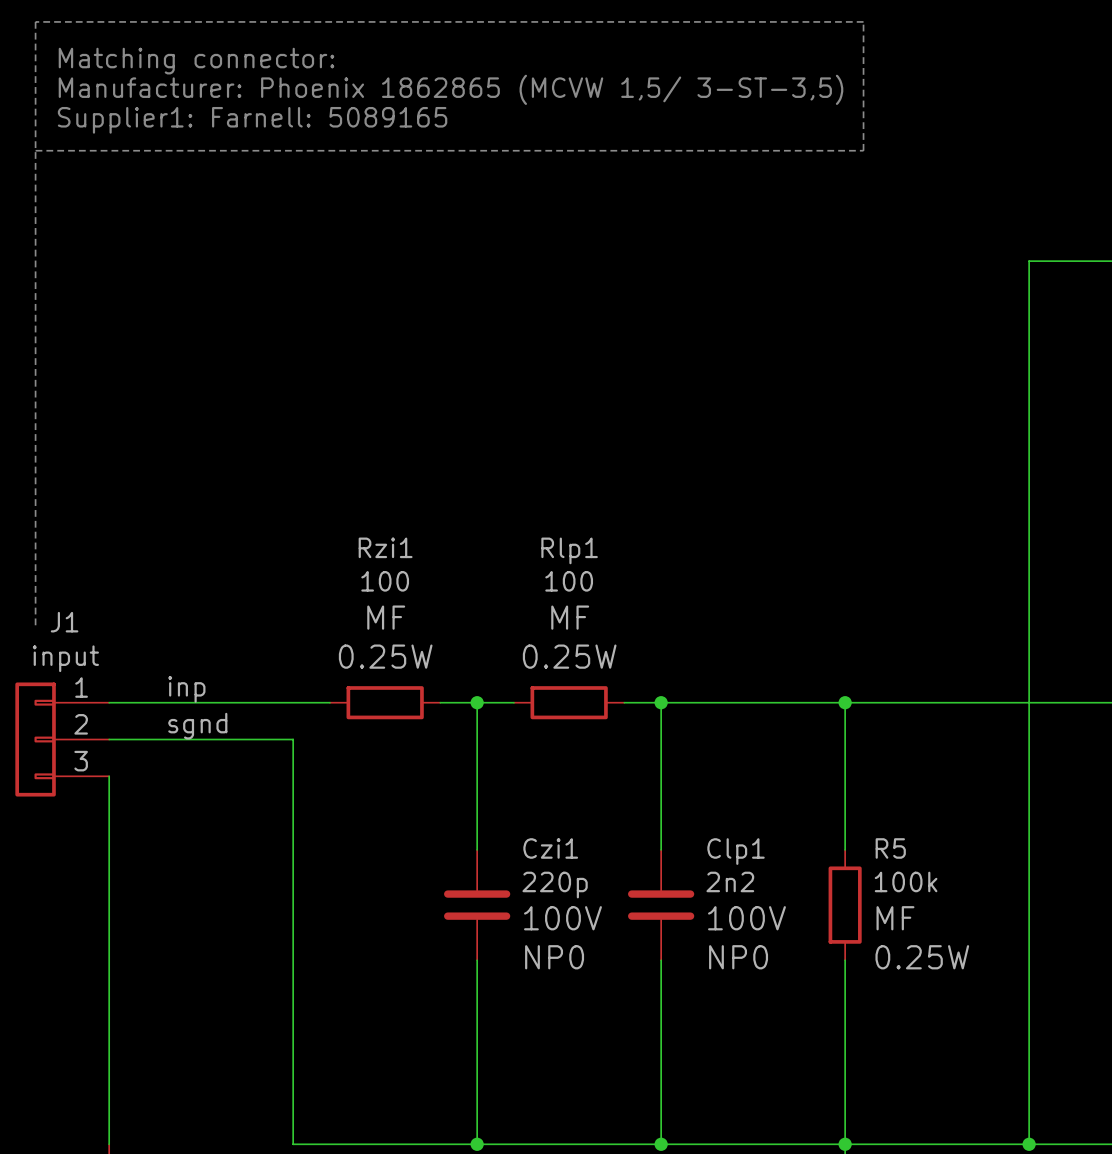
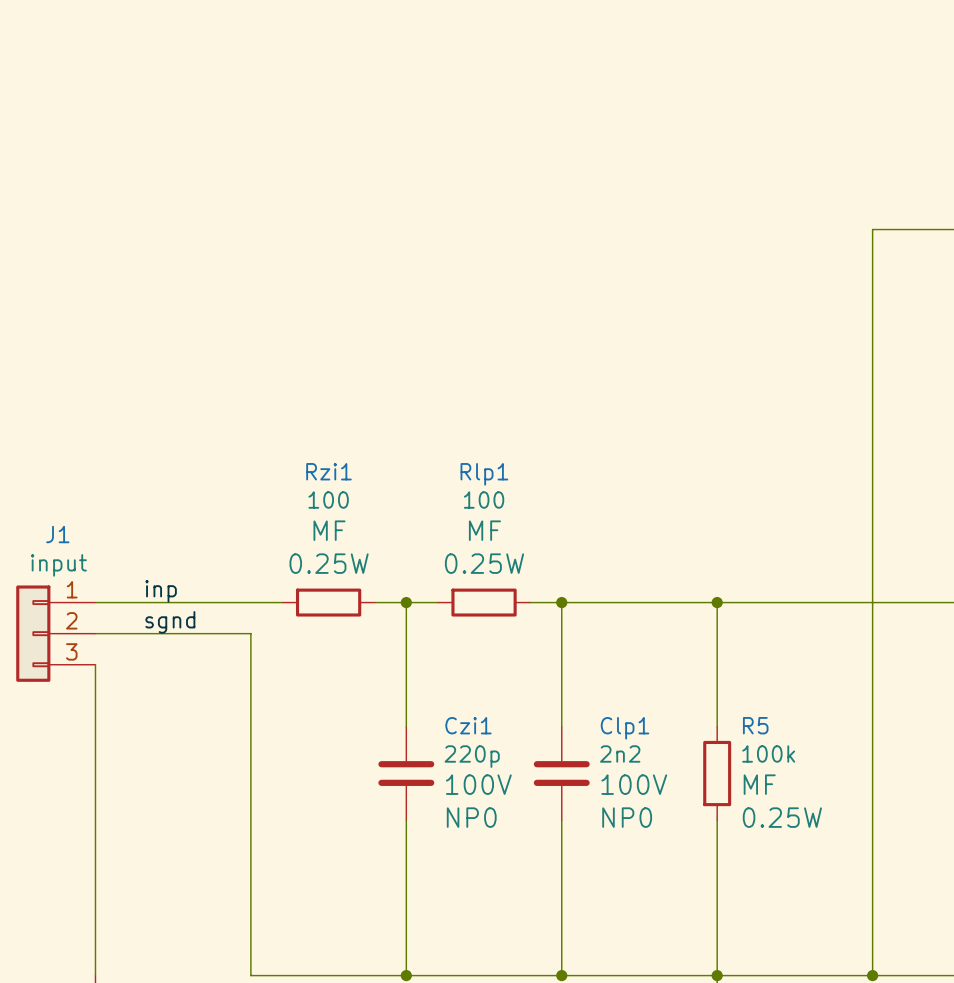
text: Matching connector: (196, 61) -> none
text: Manufacturer: Phoenix 1862865 (MCVW 1,5/ 3-ST-3,5) (451, 89) -> none
text: Supplier1: Farnell: 5089165 (252, 120) -> none
line: (35, 150) (863, 150) (863, 21) (35, 21) (35, 629) -> none

